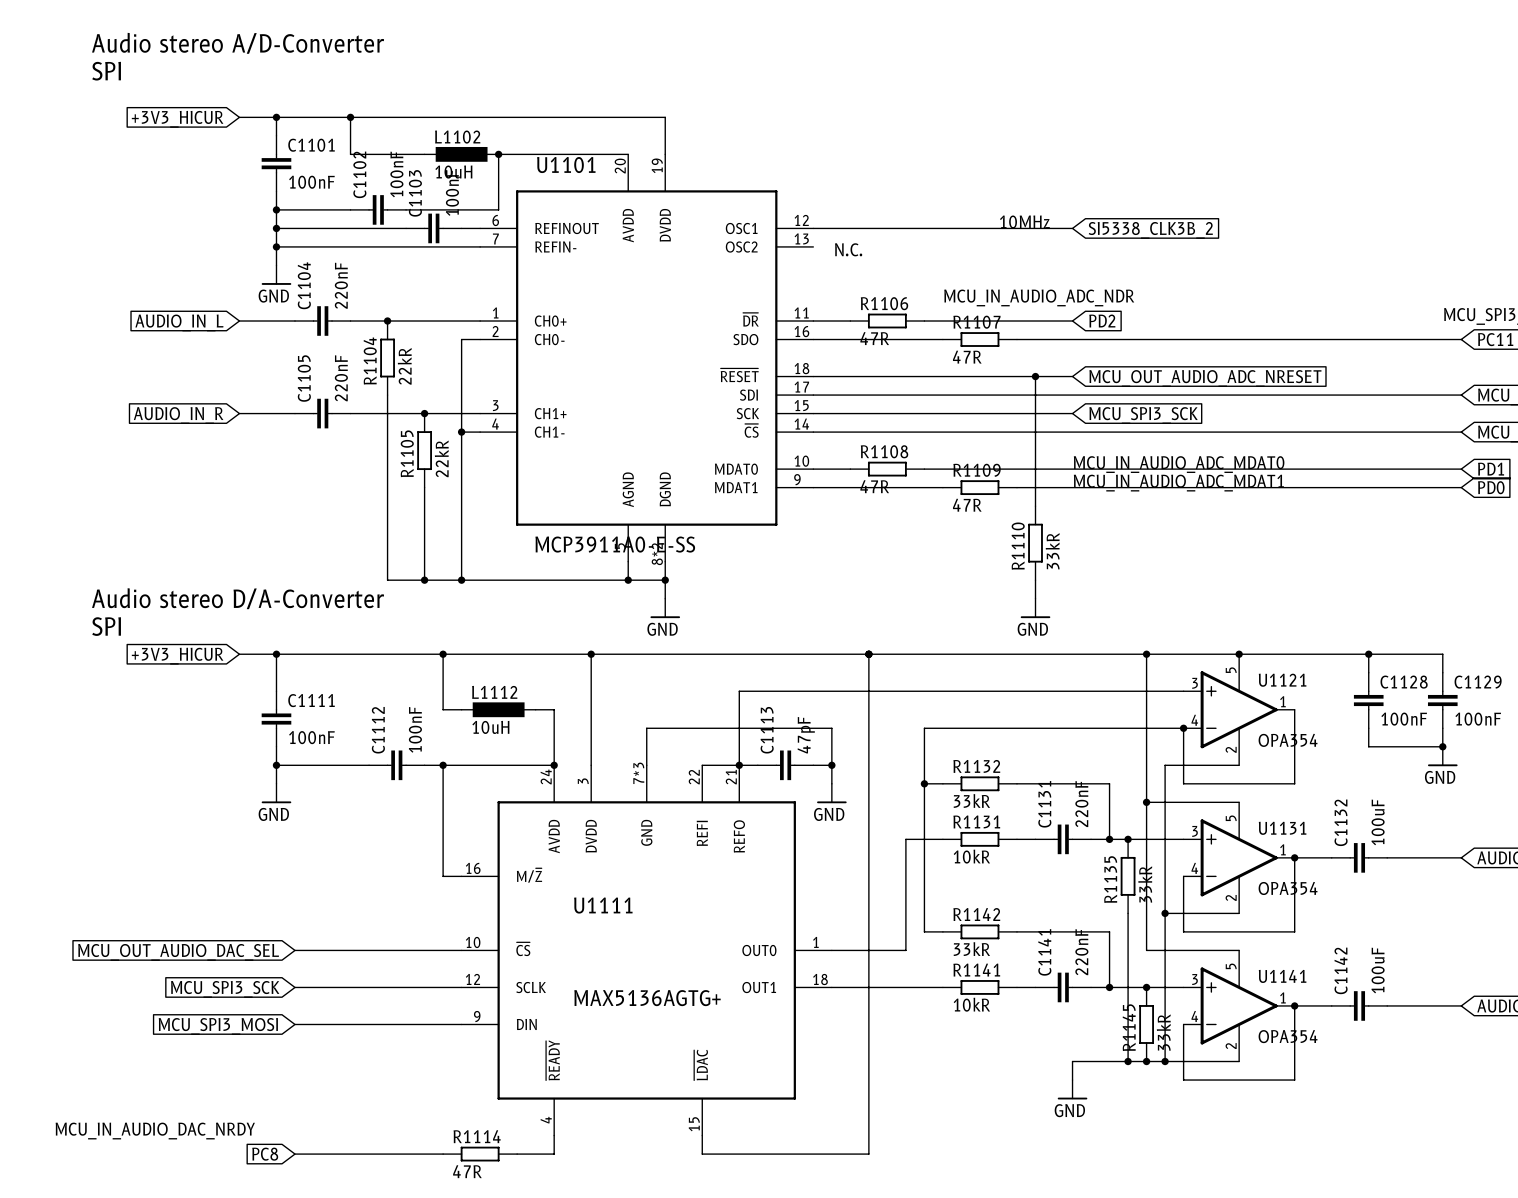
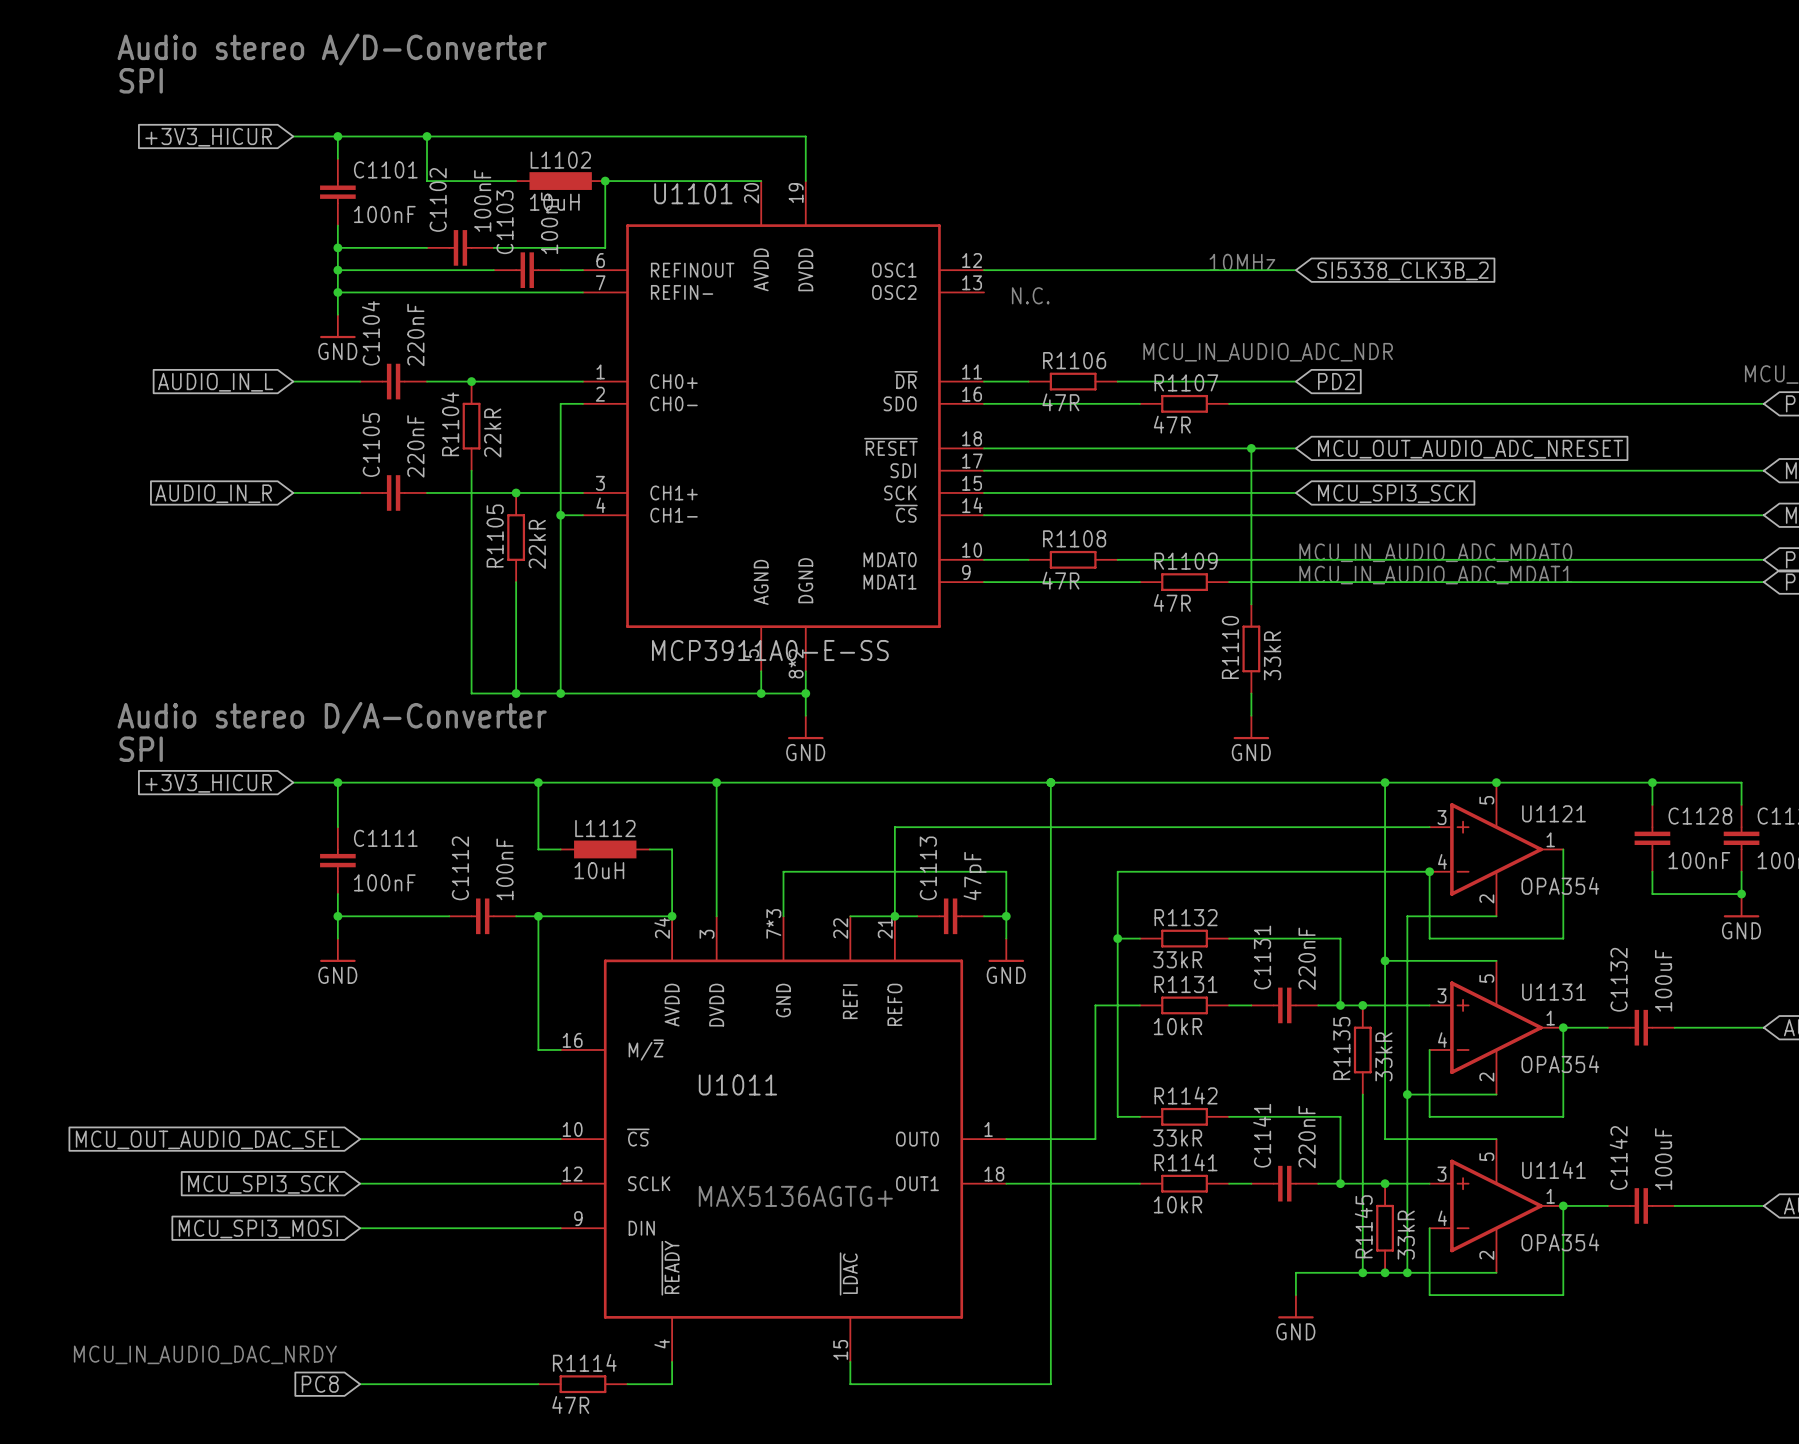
U1111 name: U1111 (603, 905) -> U1011 (737, 1084)

